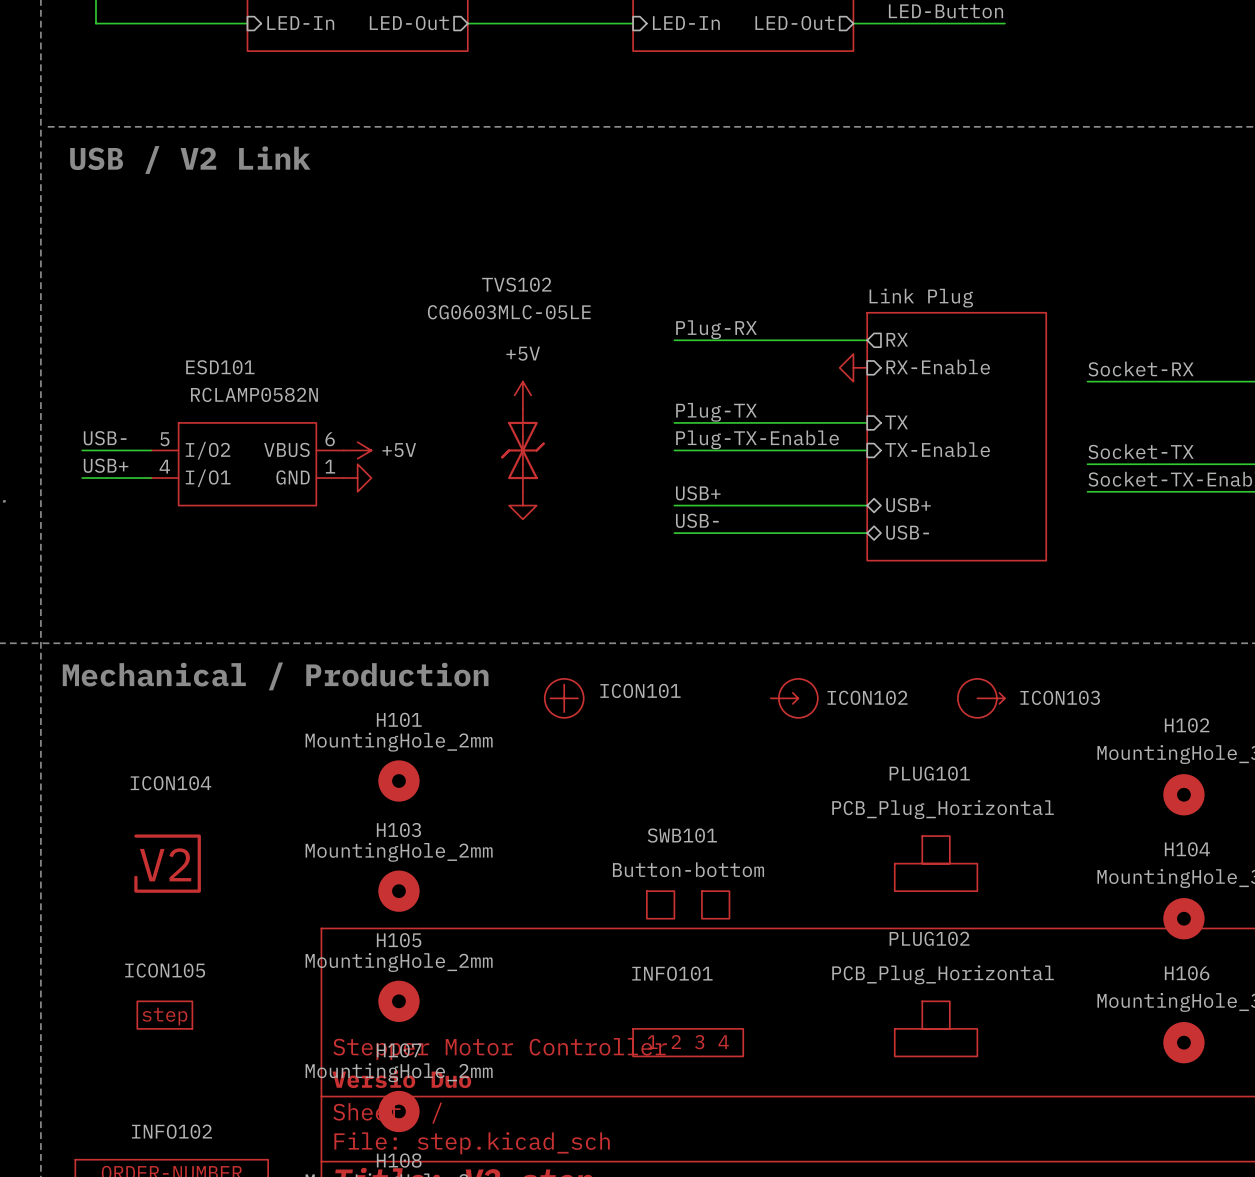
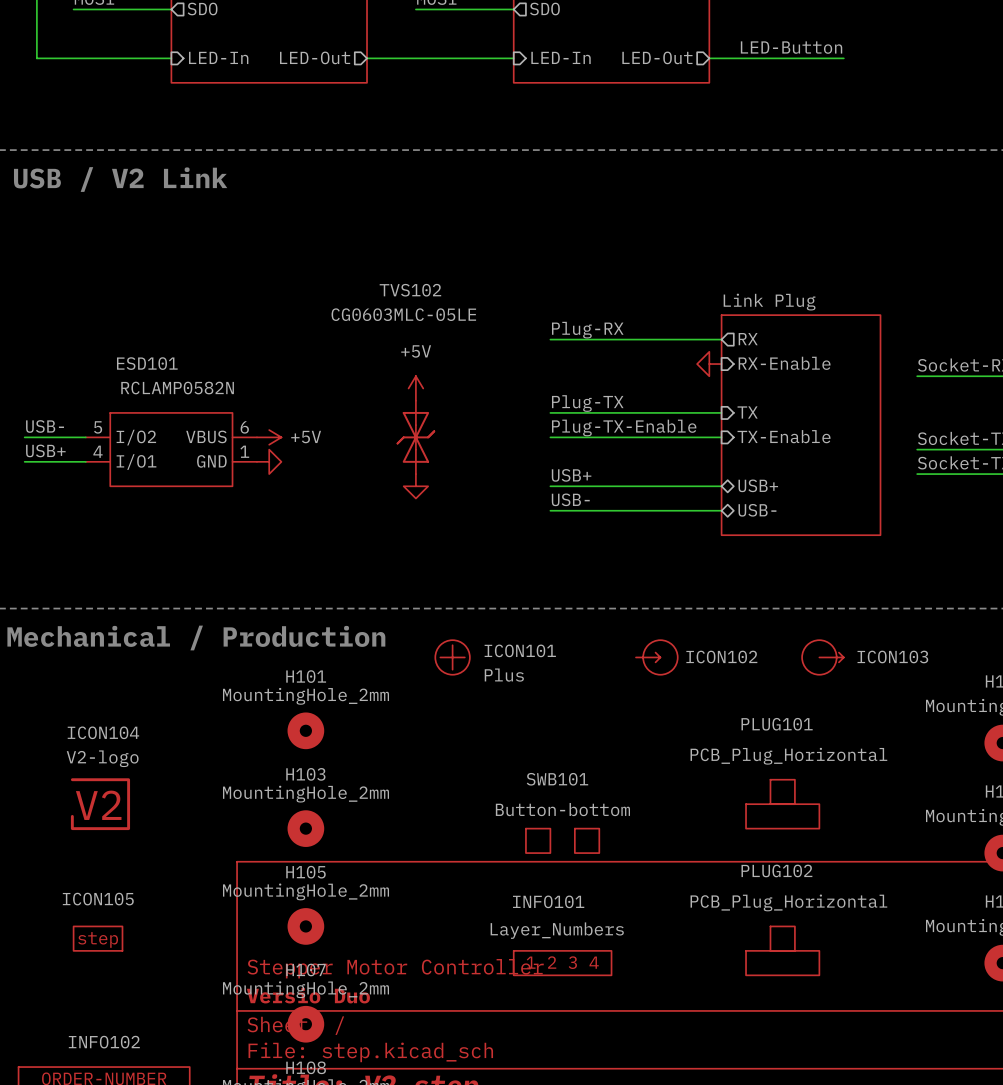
ICON101 value: none -> Plus (504, 675)
ICON104 value: none -> V2-logo (102, 758)
INFO101 value: none -> Layer_Numbers (557, 930)

